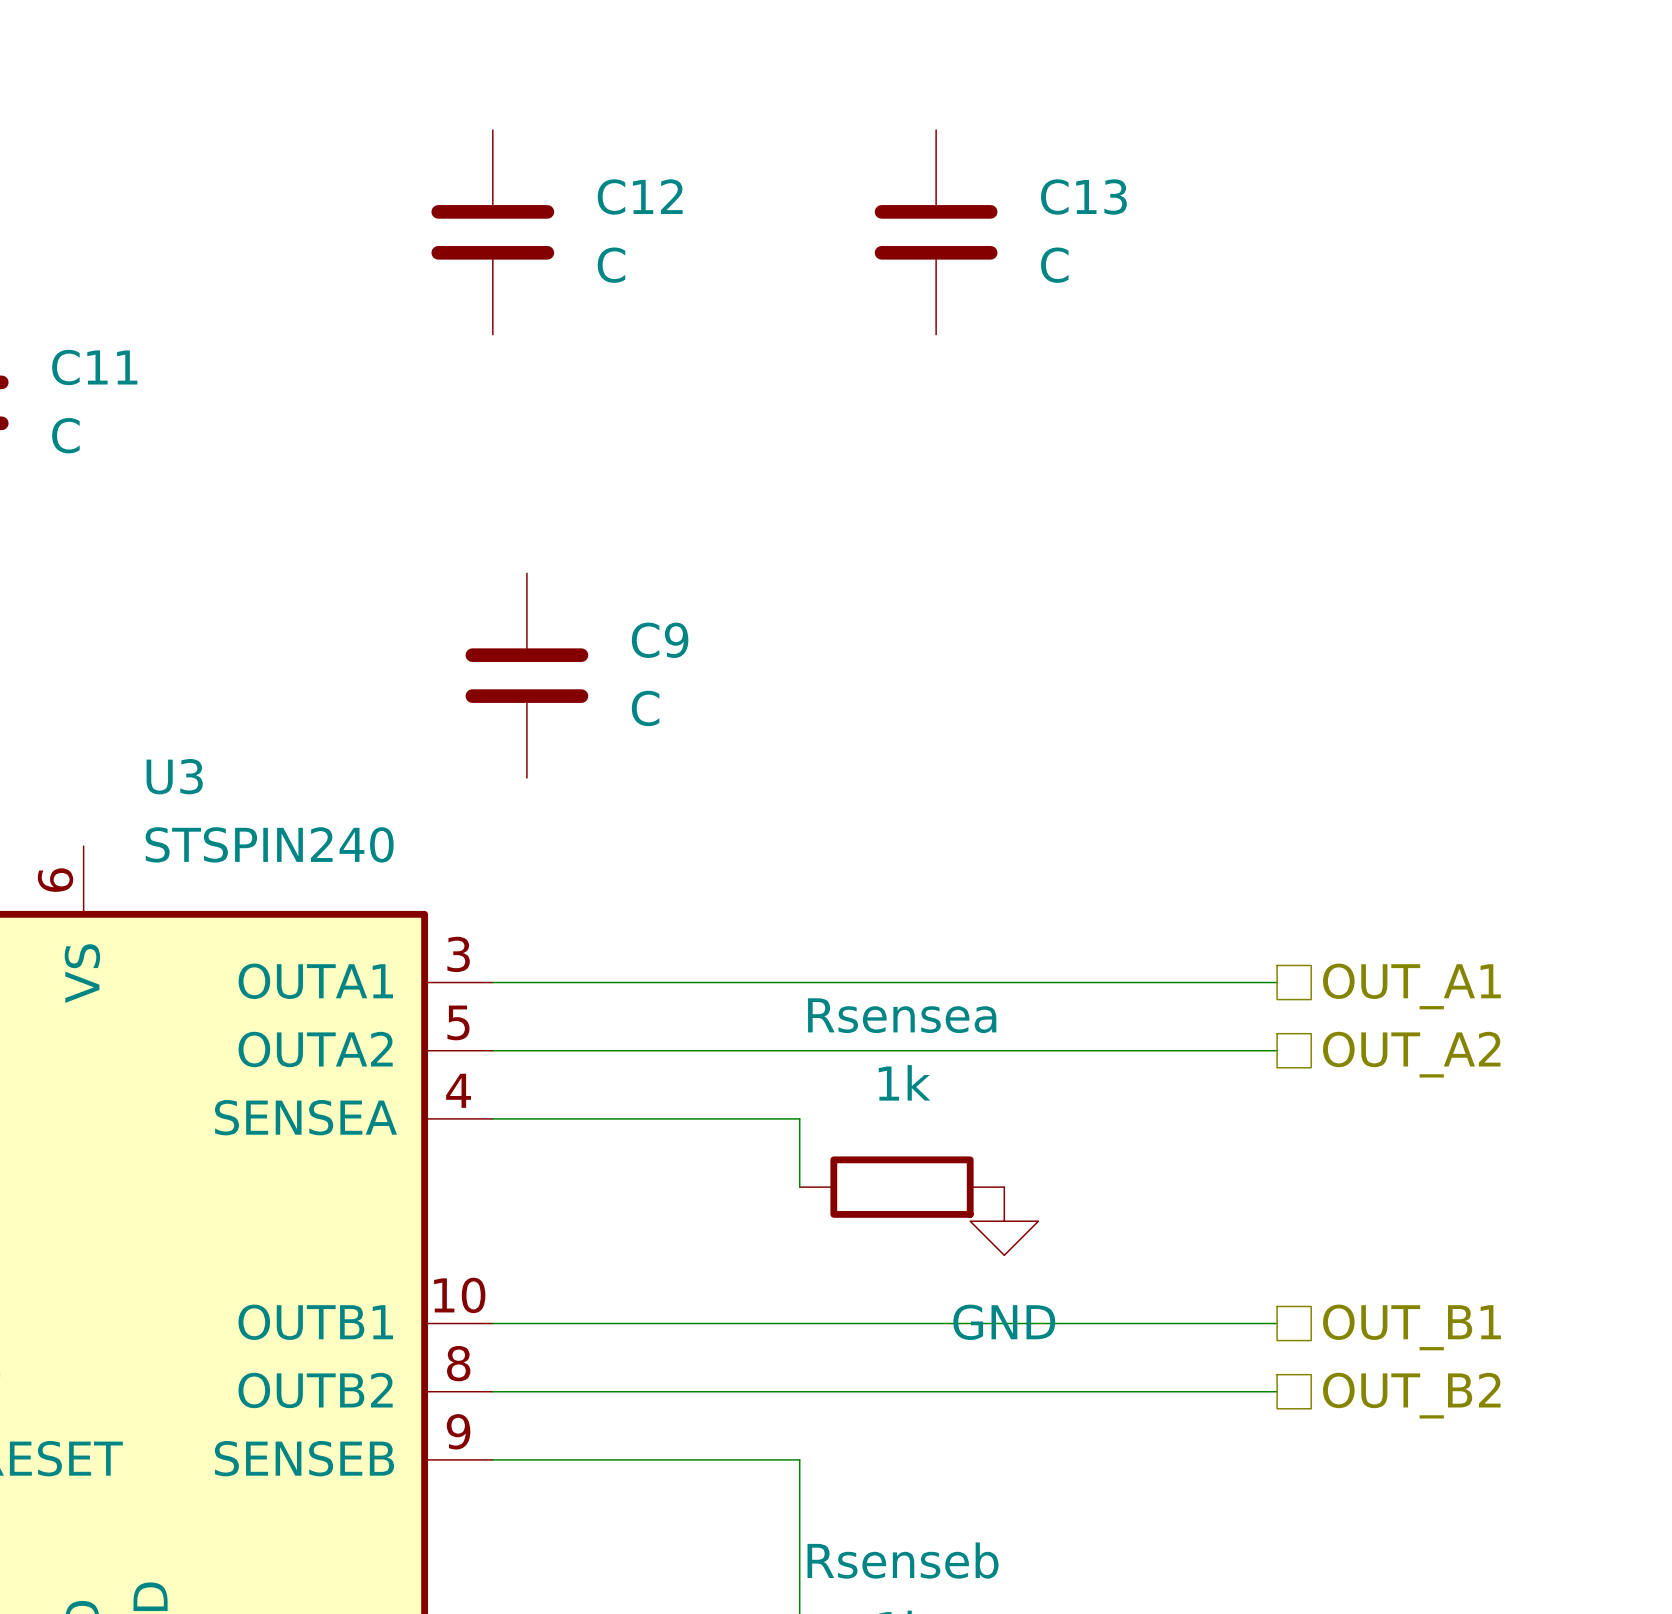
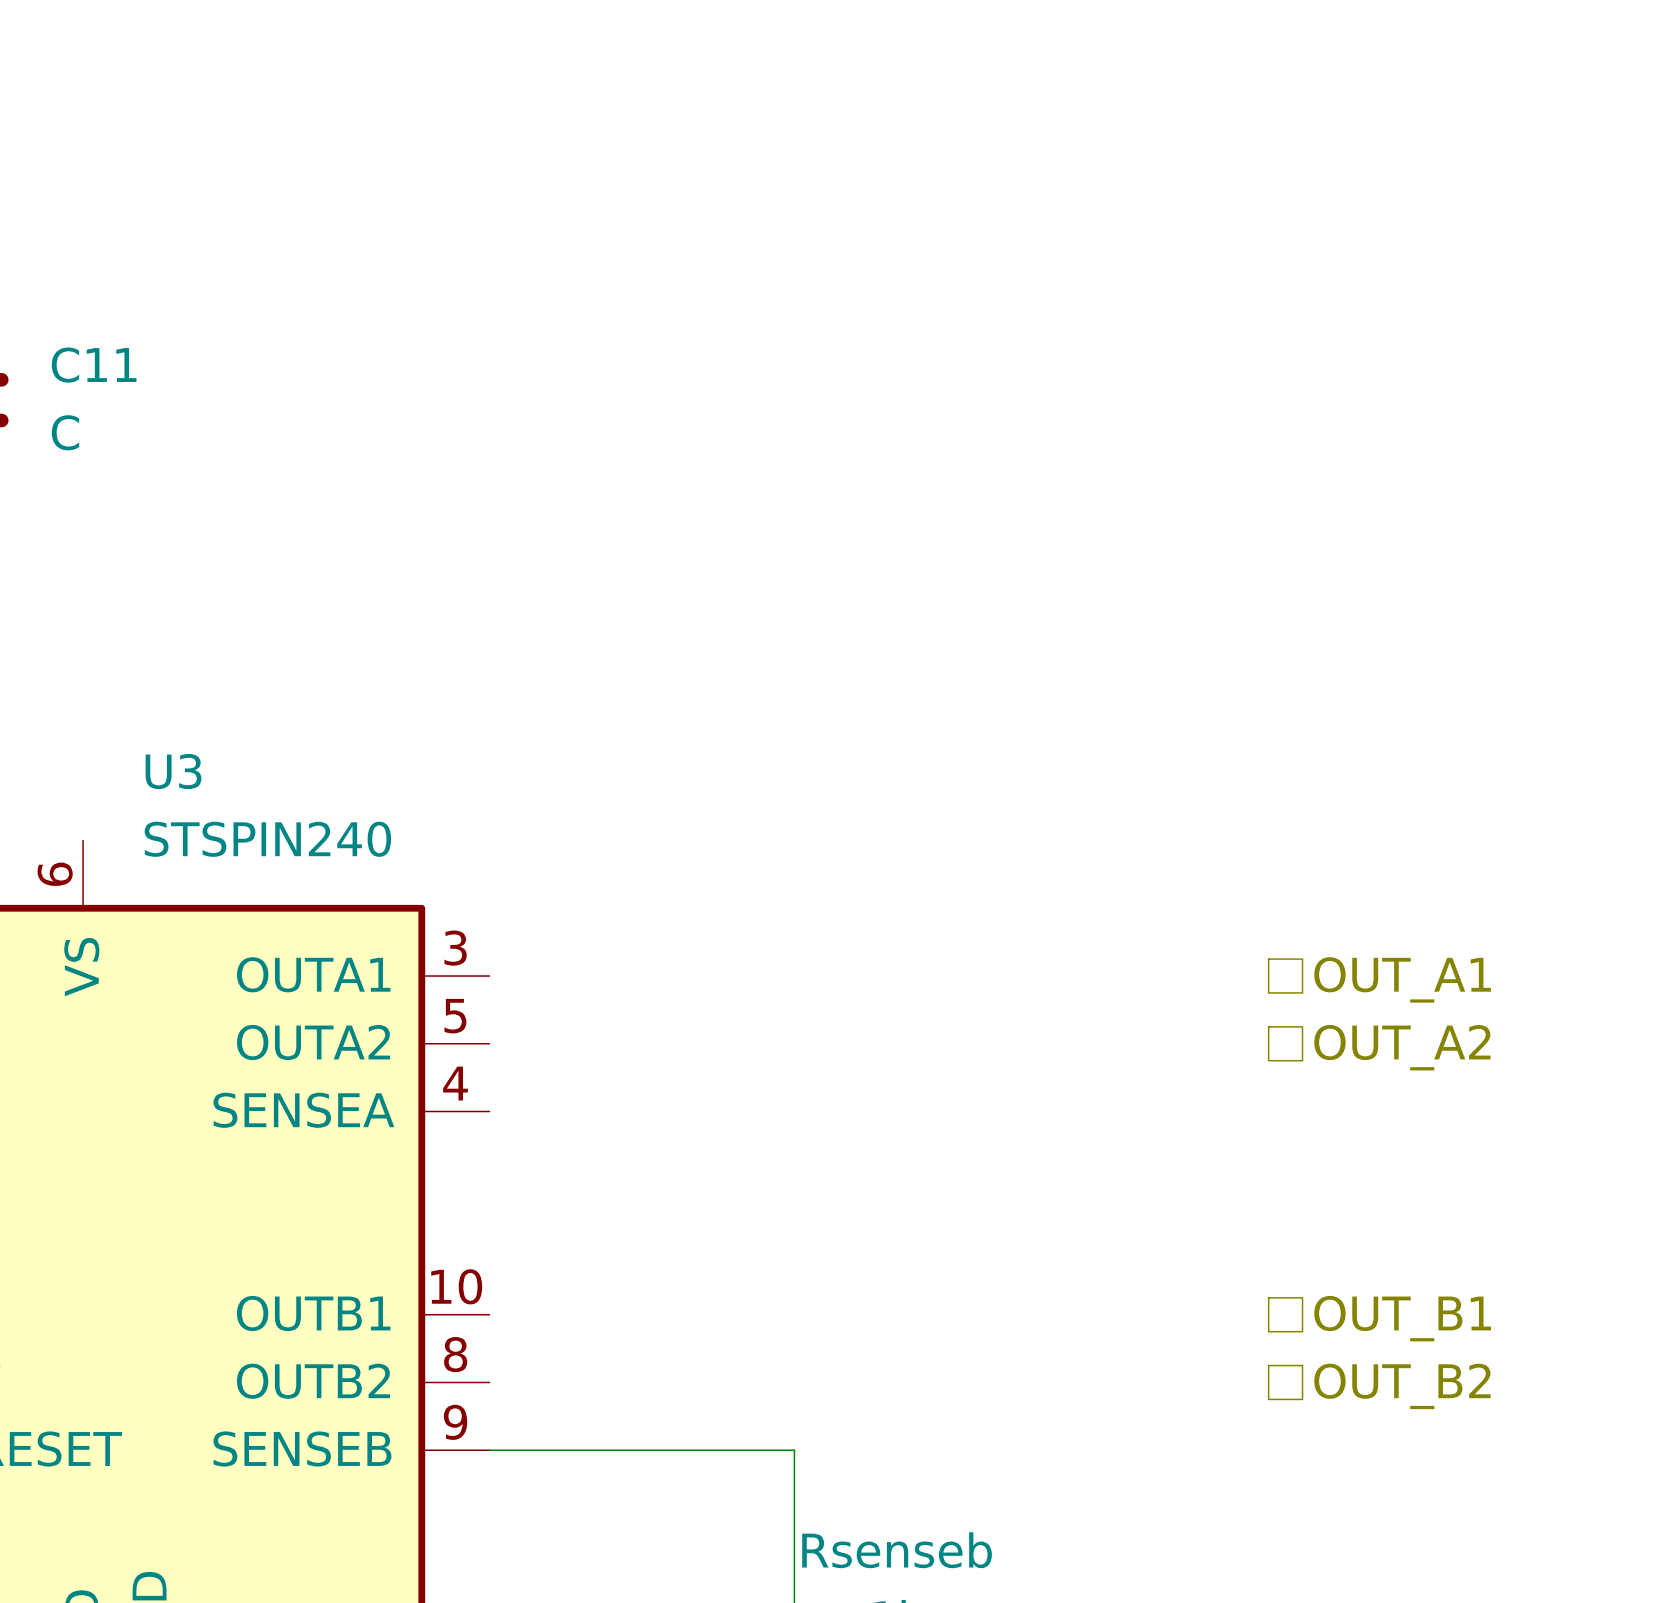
C12: C (492, 232) -> none
C13: C (936, 232) -> none
C9: C (526, 675) -> none
wire: (492, 982) (1277, 982) -> none
wire: (492, 1050) (1277, 1050) -> none
wire: (492, 1118) (799, 1118) (799, 1187) -> none
Rsensea: 1k (902, 1187) -> none
power symbol: GND (1004, 1221) -> none
wire: (492, 1323) (1277, 1323) -> none
wire: (492, 1391) (1277, 1391) -> none

